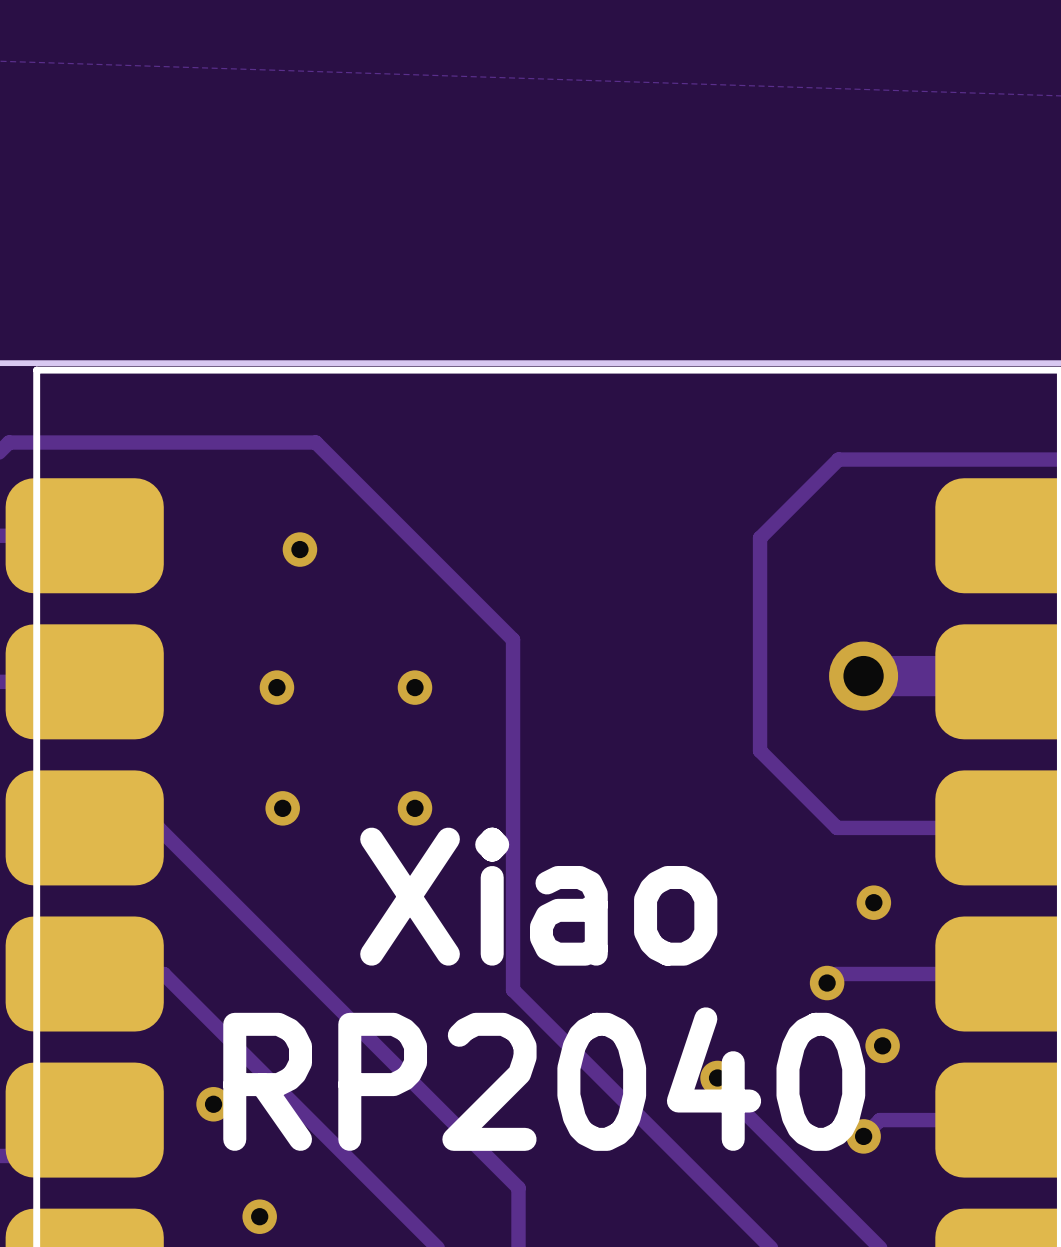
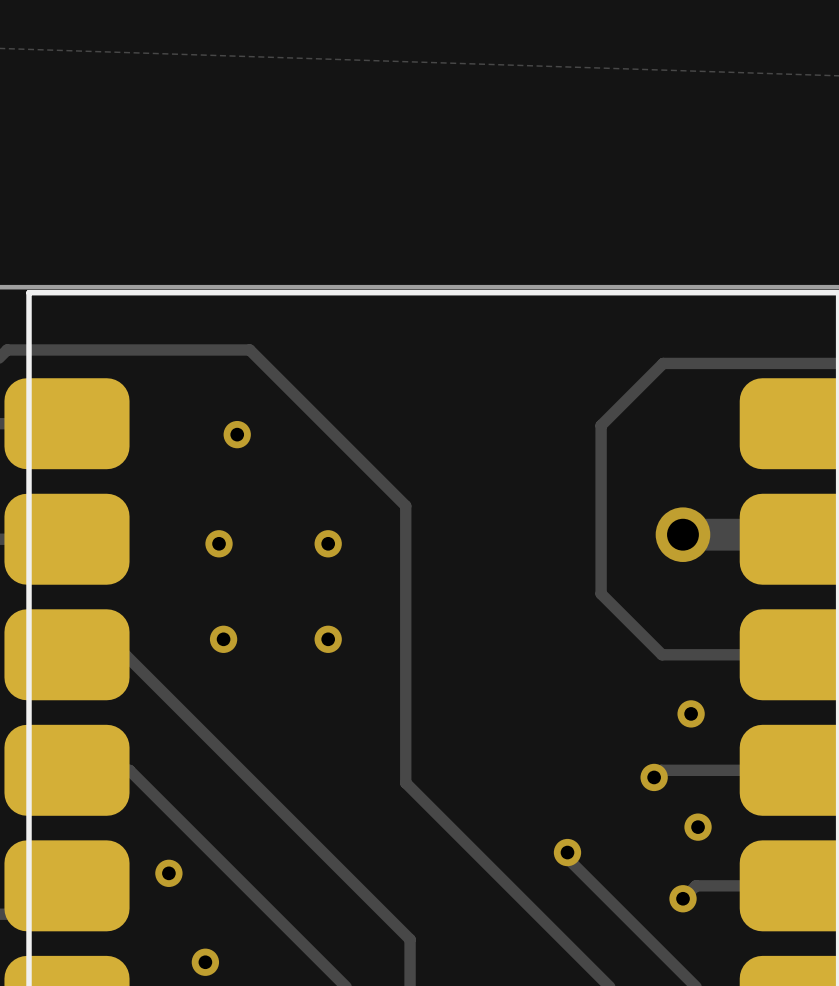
text: Xiao (538, 896) -> none
text: RP2040 (544, 1079) -> none

